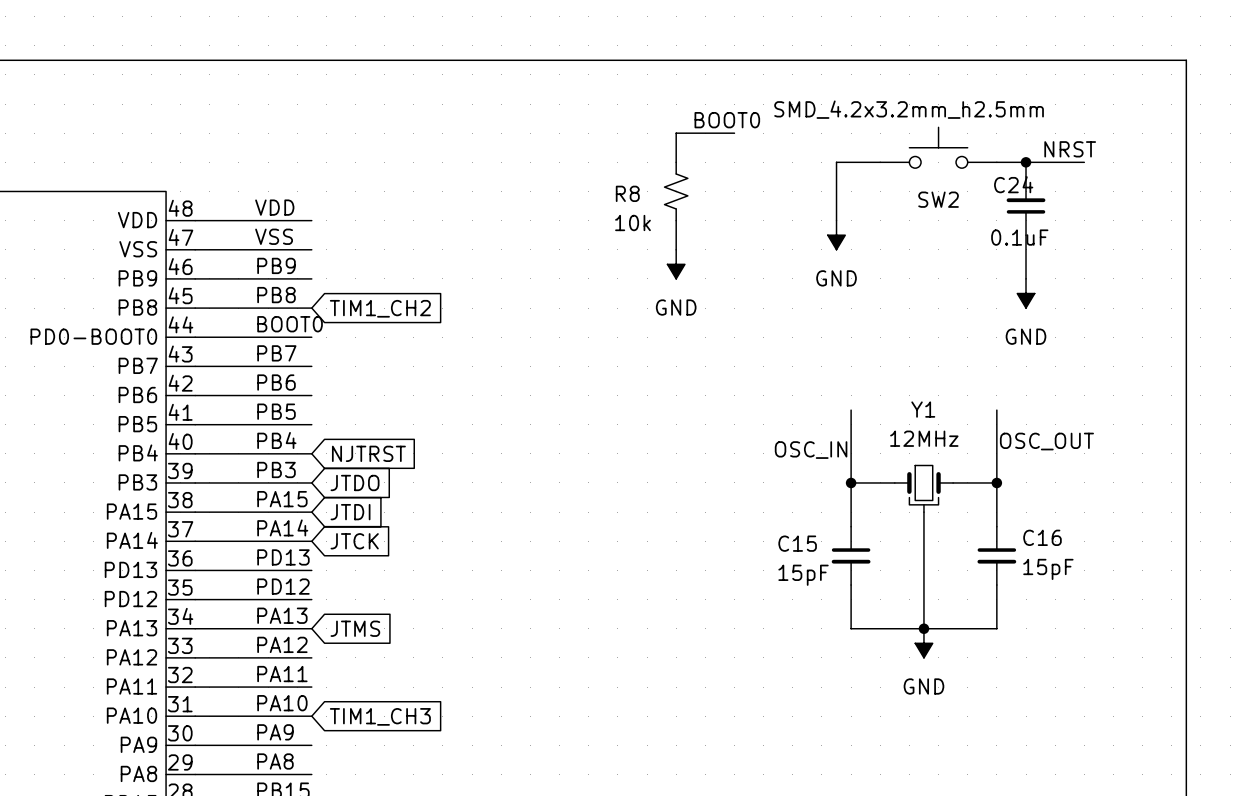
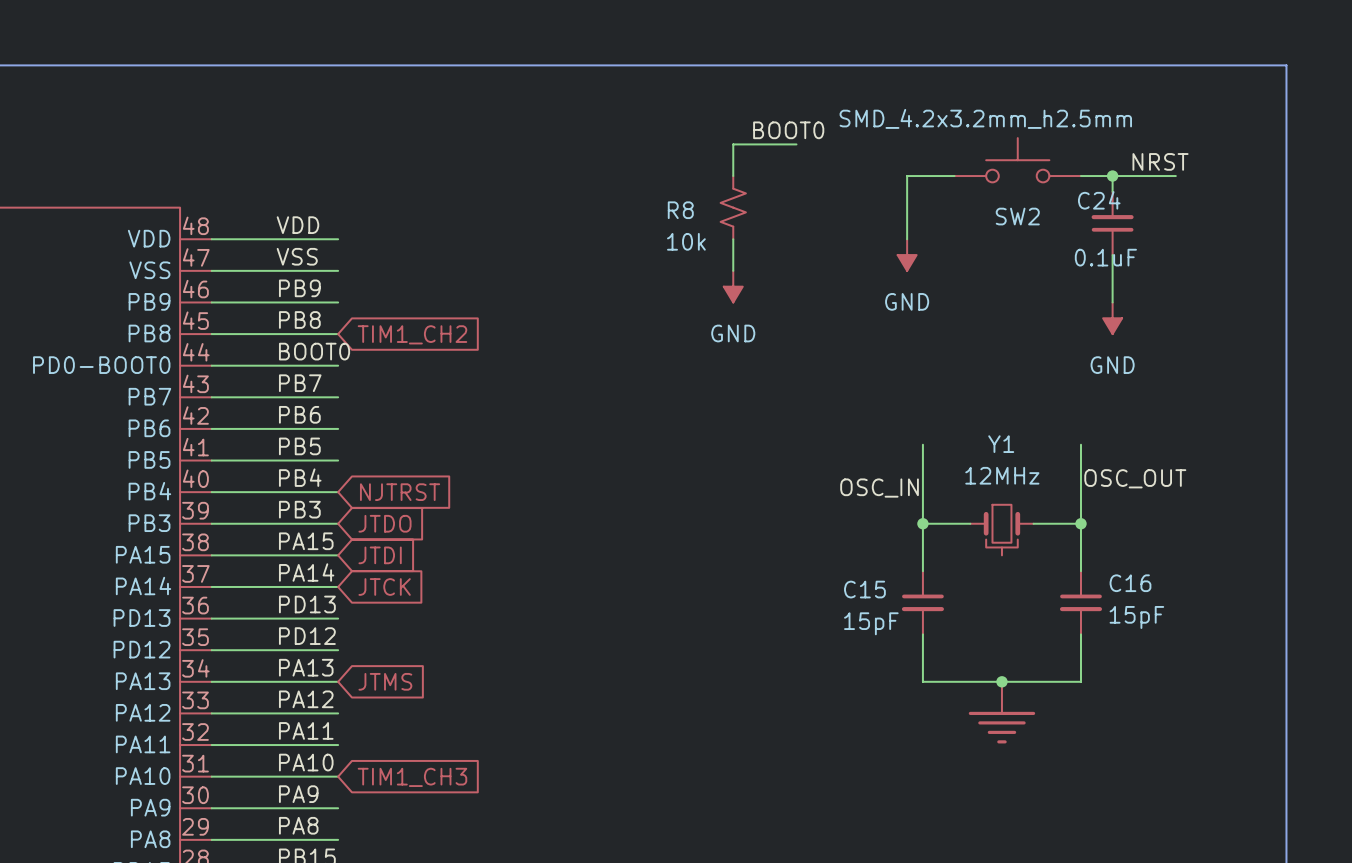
wire: (923, 512) (923, 628) -> none
power symbol: GND (923, 643) -> none
power symbol: none -> (1001, 712)

